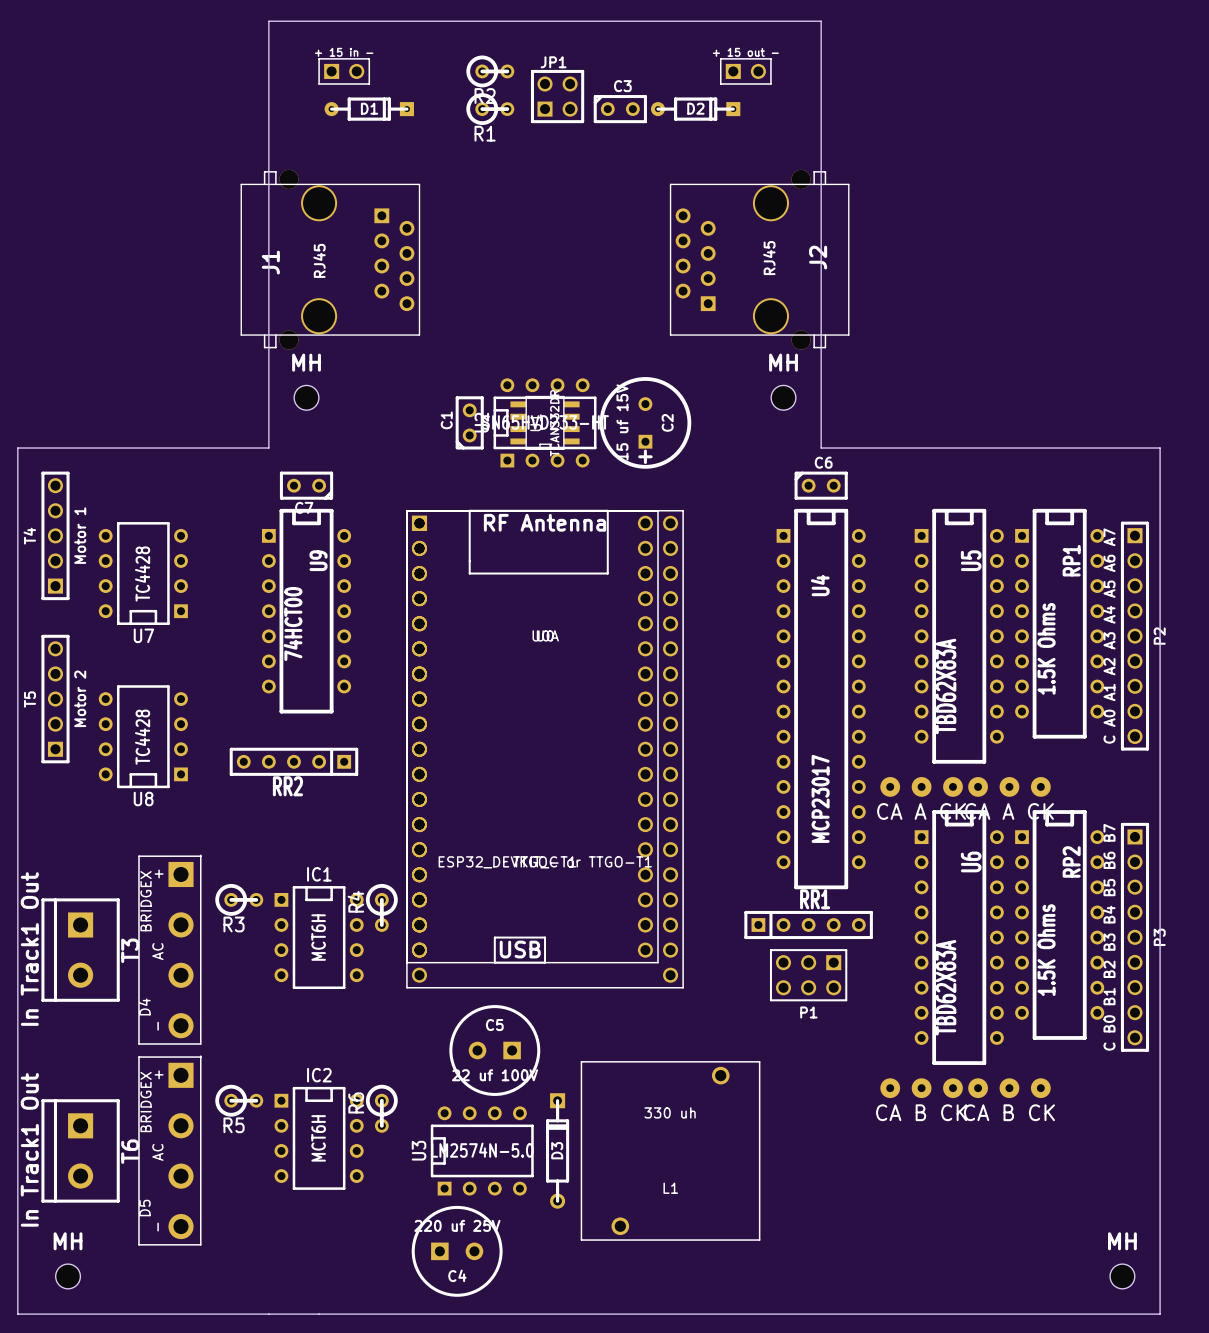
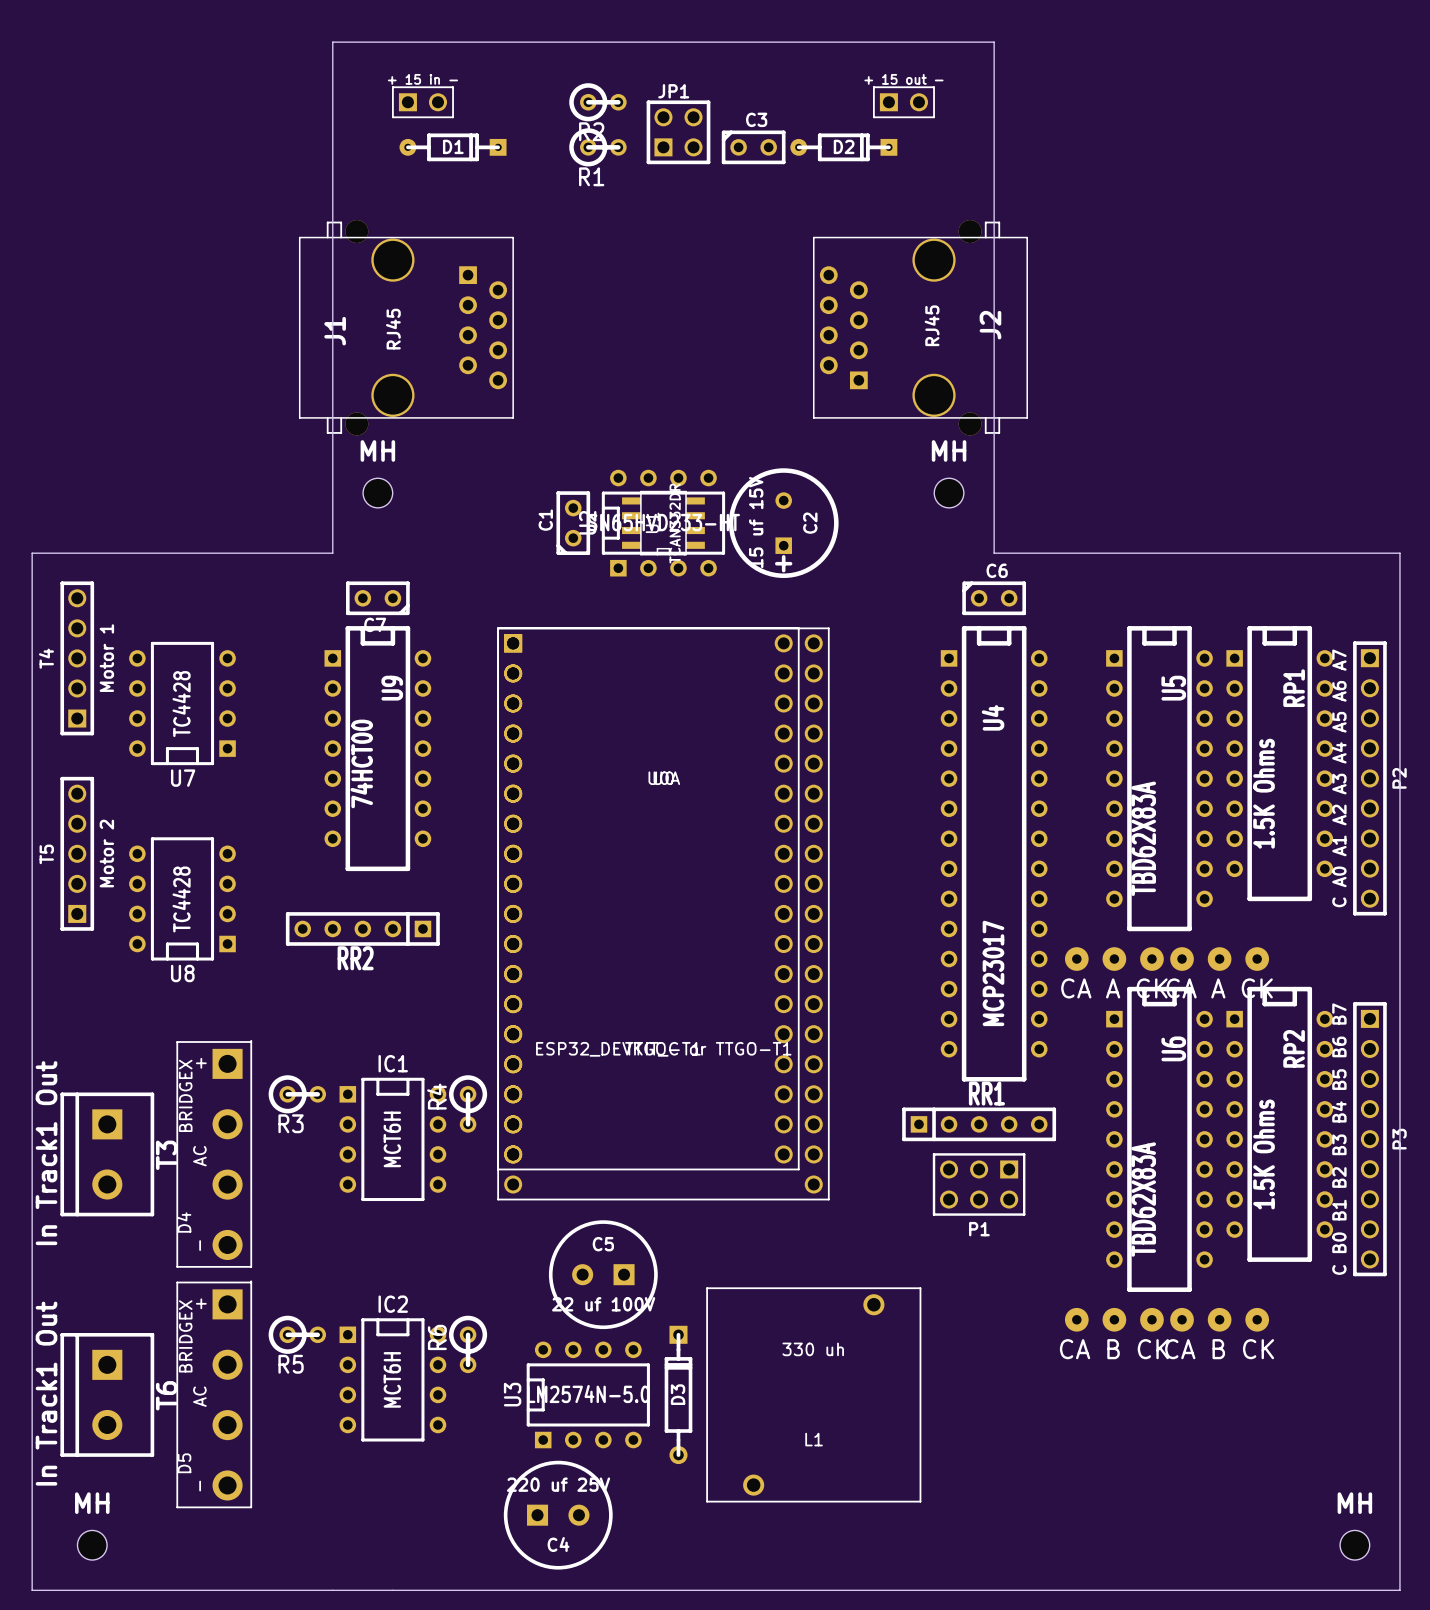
line: (469, 510) (607, 510) (607, 573) (469, 573) (469, 510) -> none
text: RF Antenna (545, 522) -> none
line: (494, 937) (545, 937) (545, 962) (494, 962) (494, 937) -> none
text: USB (520, 949) -> none

